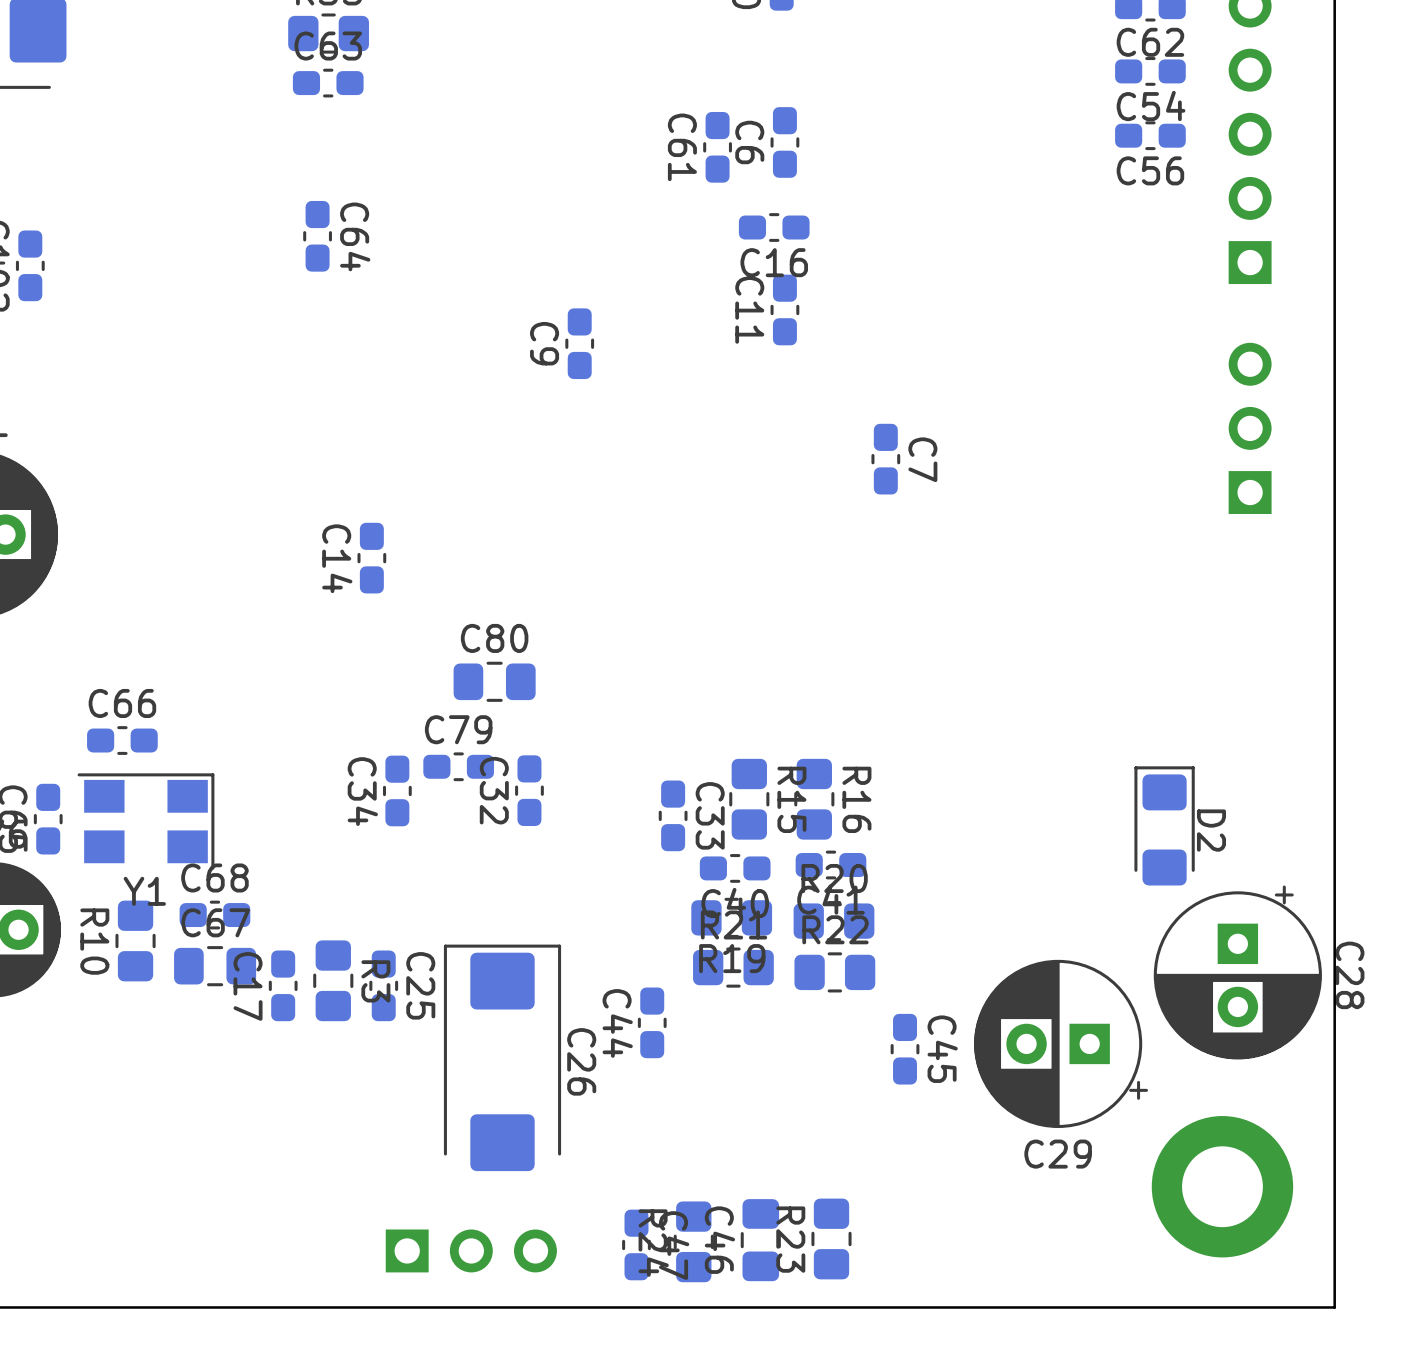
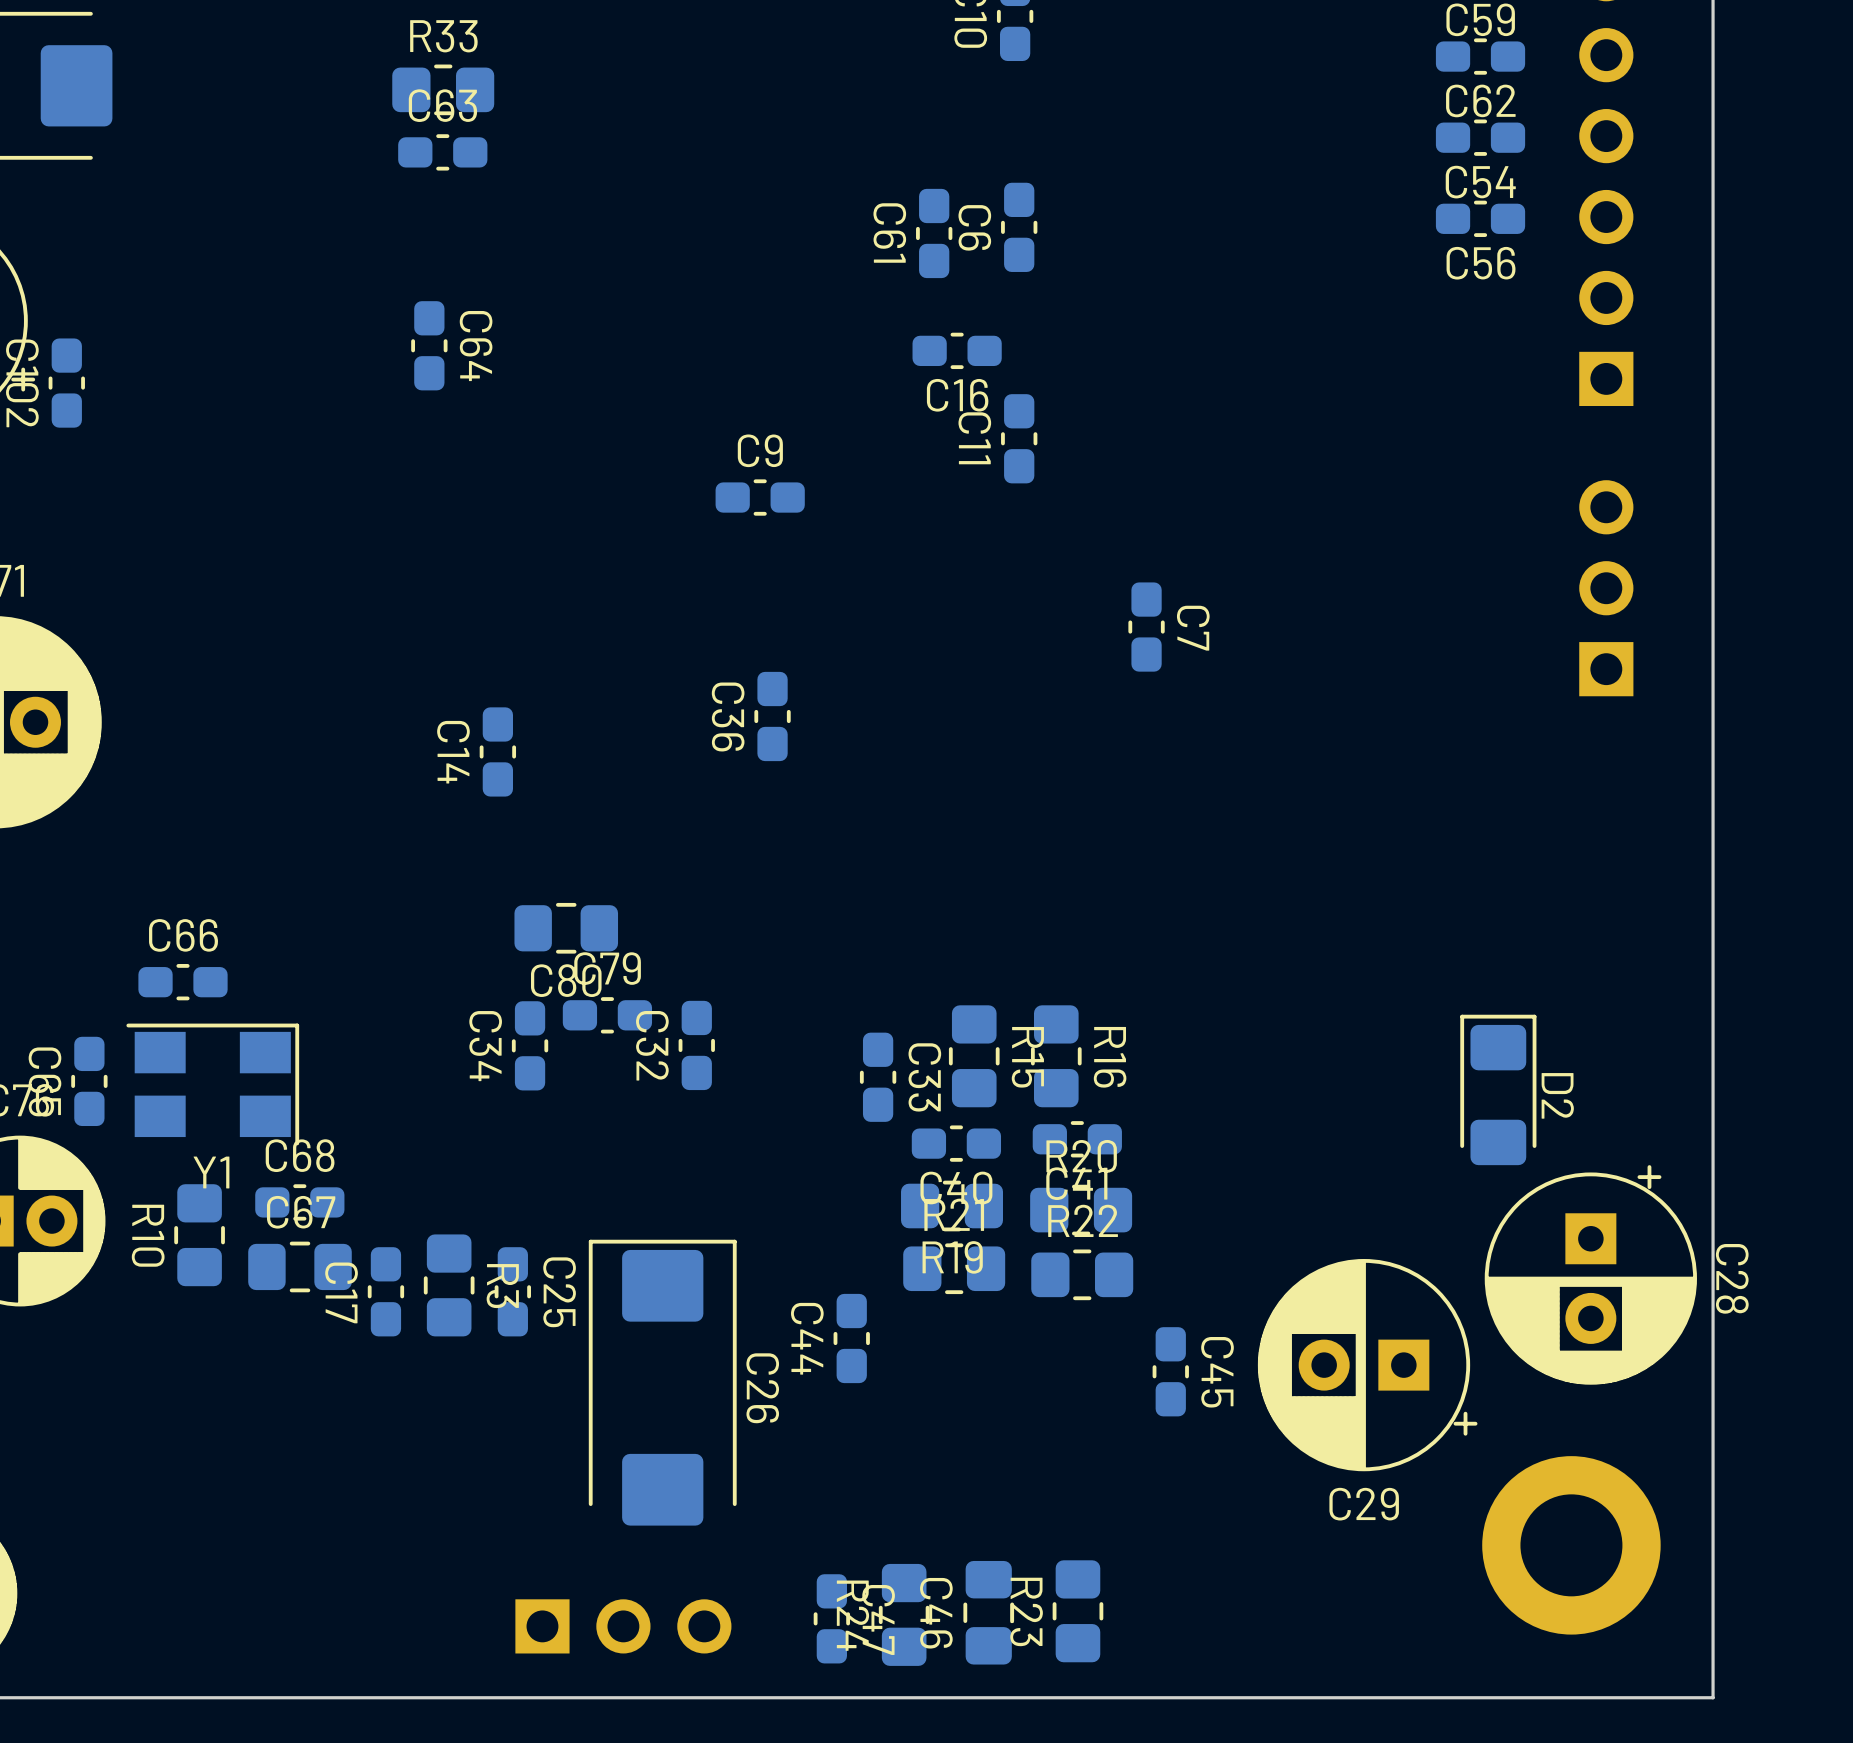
C16 position: (774, 227) -> (957, 350)
C9 rotation: 0° (579, 343) -> 90° clockwise (760, 497)
C36: none -> (772, 716)
C80 name position: C80 (494, 638) -> C80 (566, 980)
C80 position: (494, 681) -> (566, 928)

